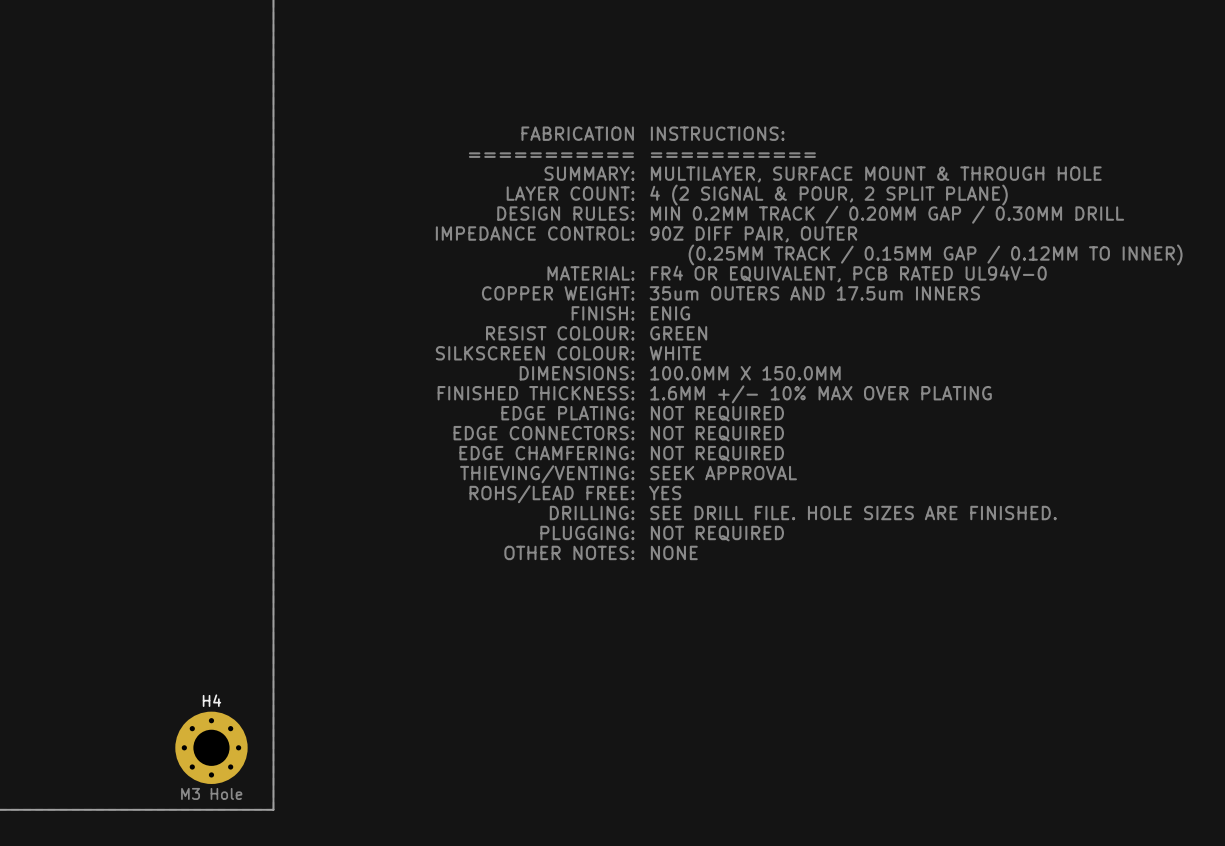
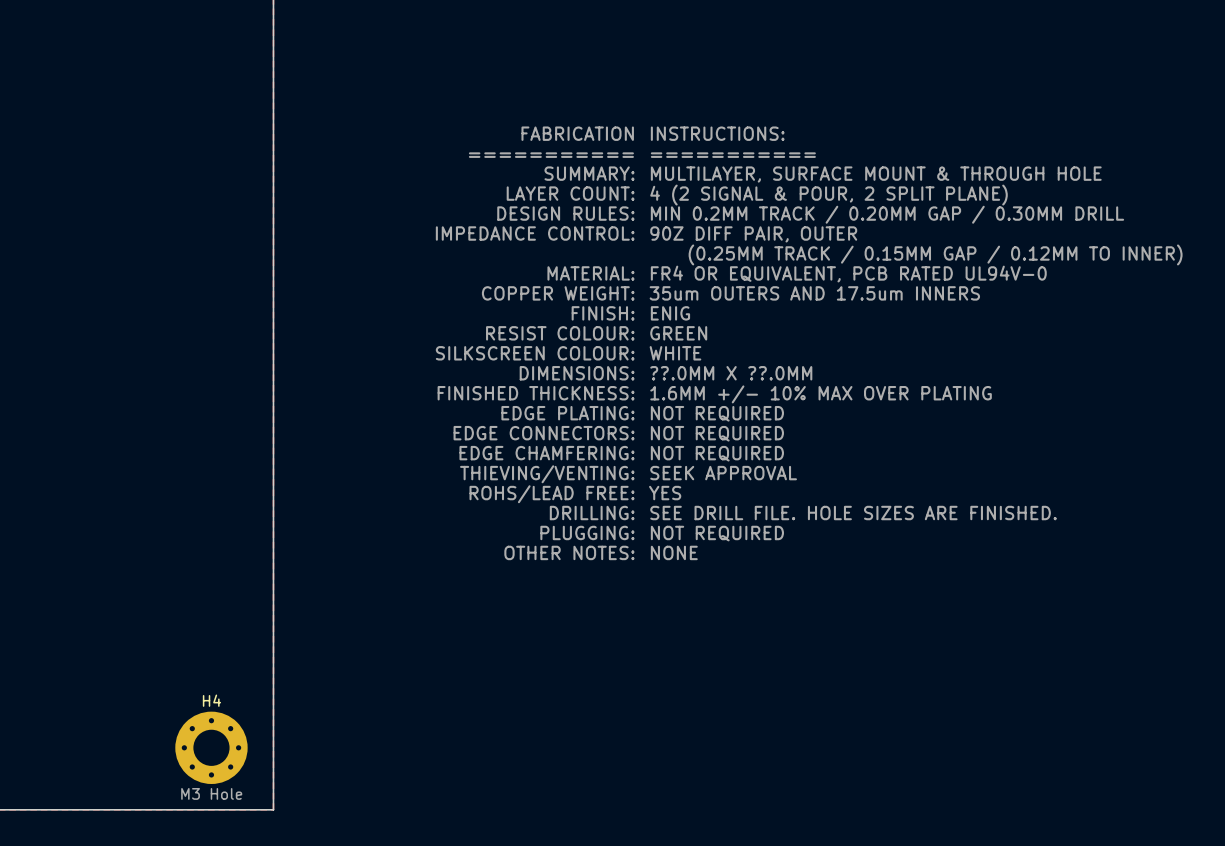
text: 100.0MM X 150.0MM (745, 373) -> ??.0MM X ??.0MM (731, 373)

